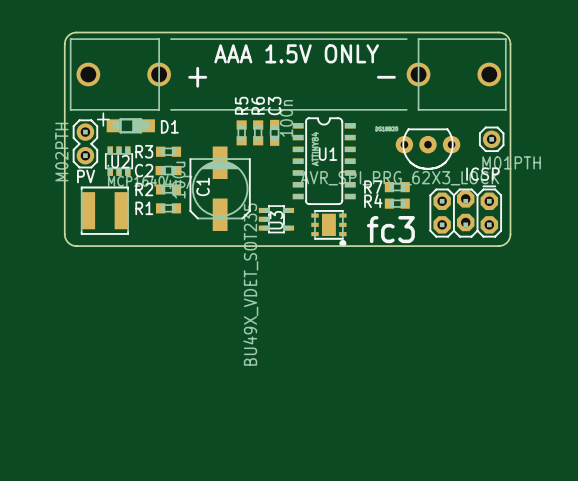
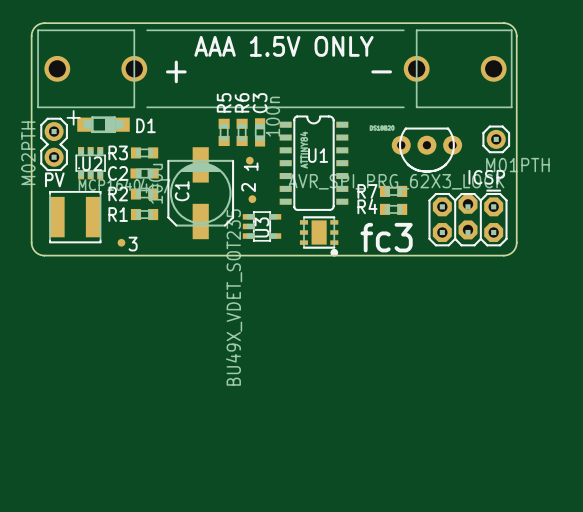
part: none -> (249, 160)
text: none -> 1 (251, 166)
text: none -> 2 (248, 187)
part: none -> (252, 199)
part: none -> (121, 242)
text: none -> 3 (133, 244)

